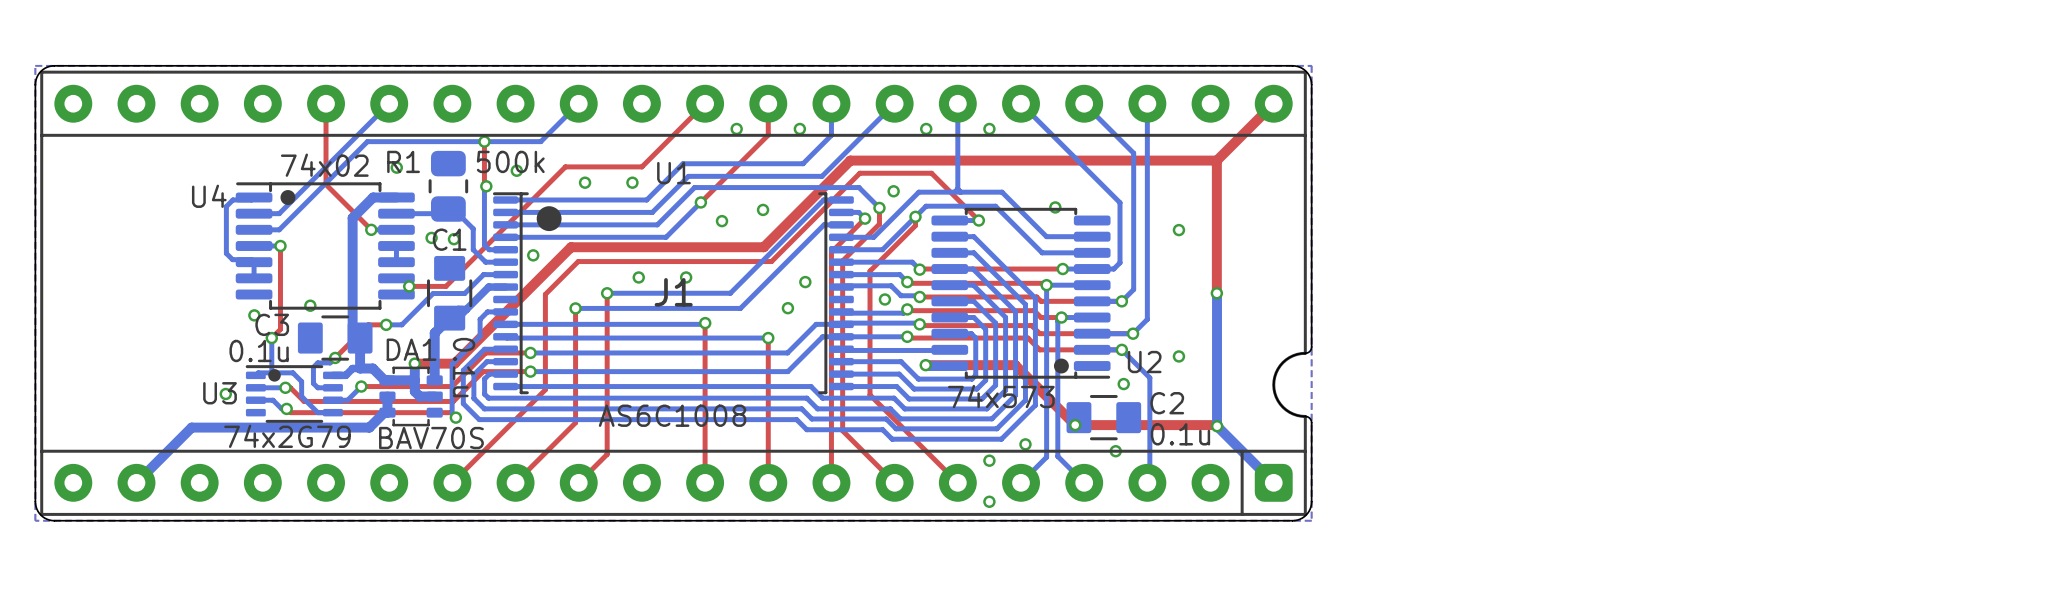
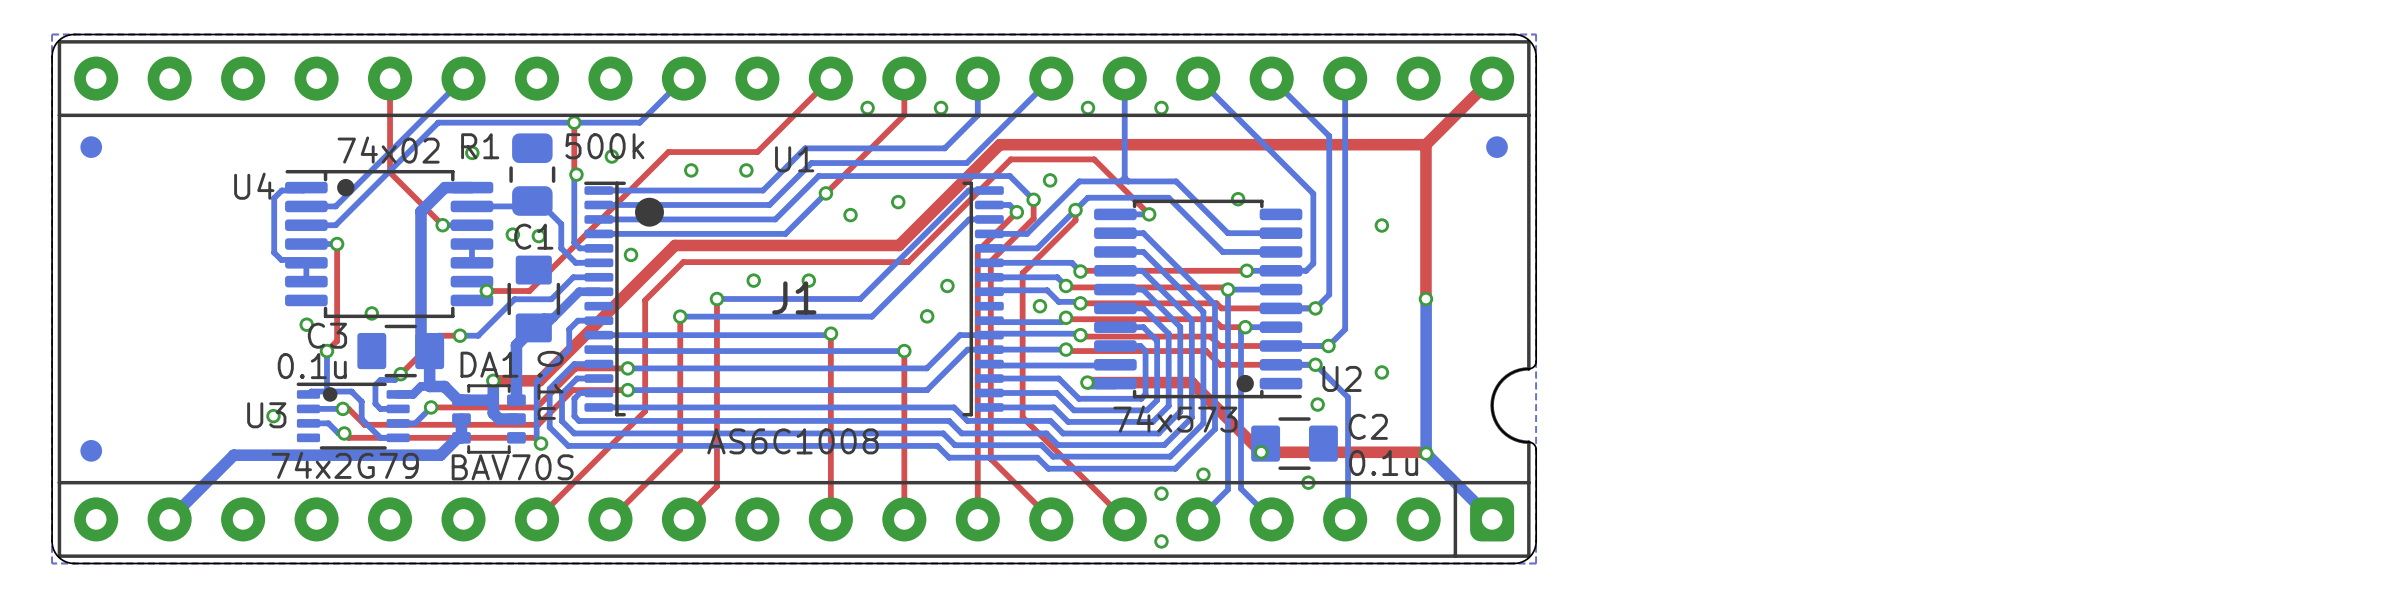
part: none -> (91, 147)
part: none -> (1497, 147)
part: none -> (91, 450)

